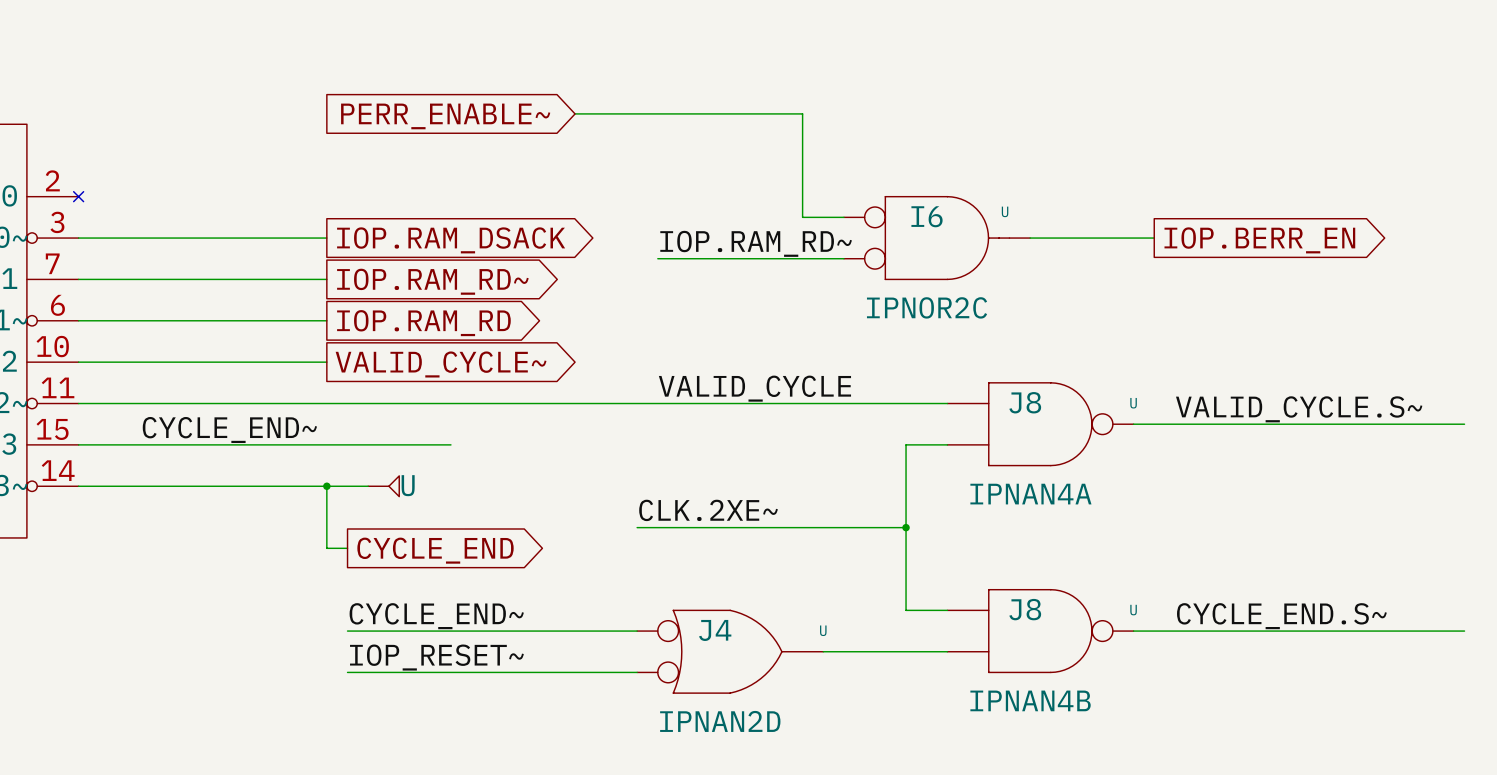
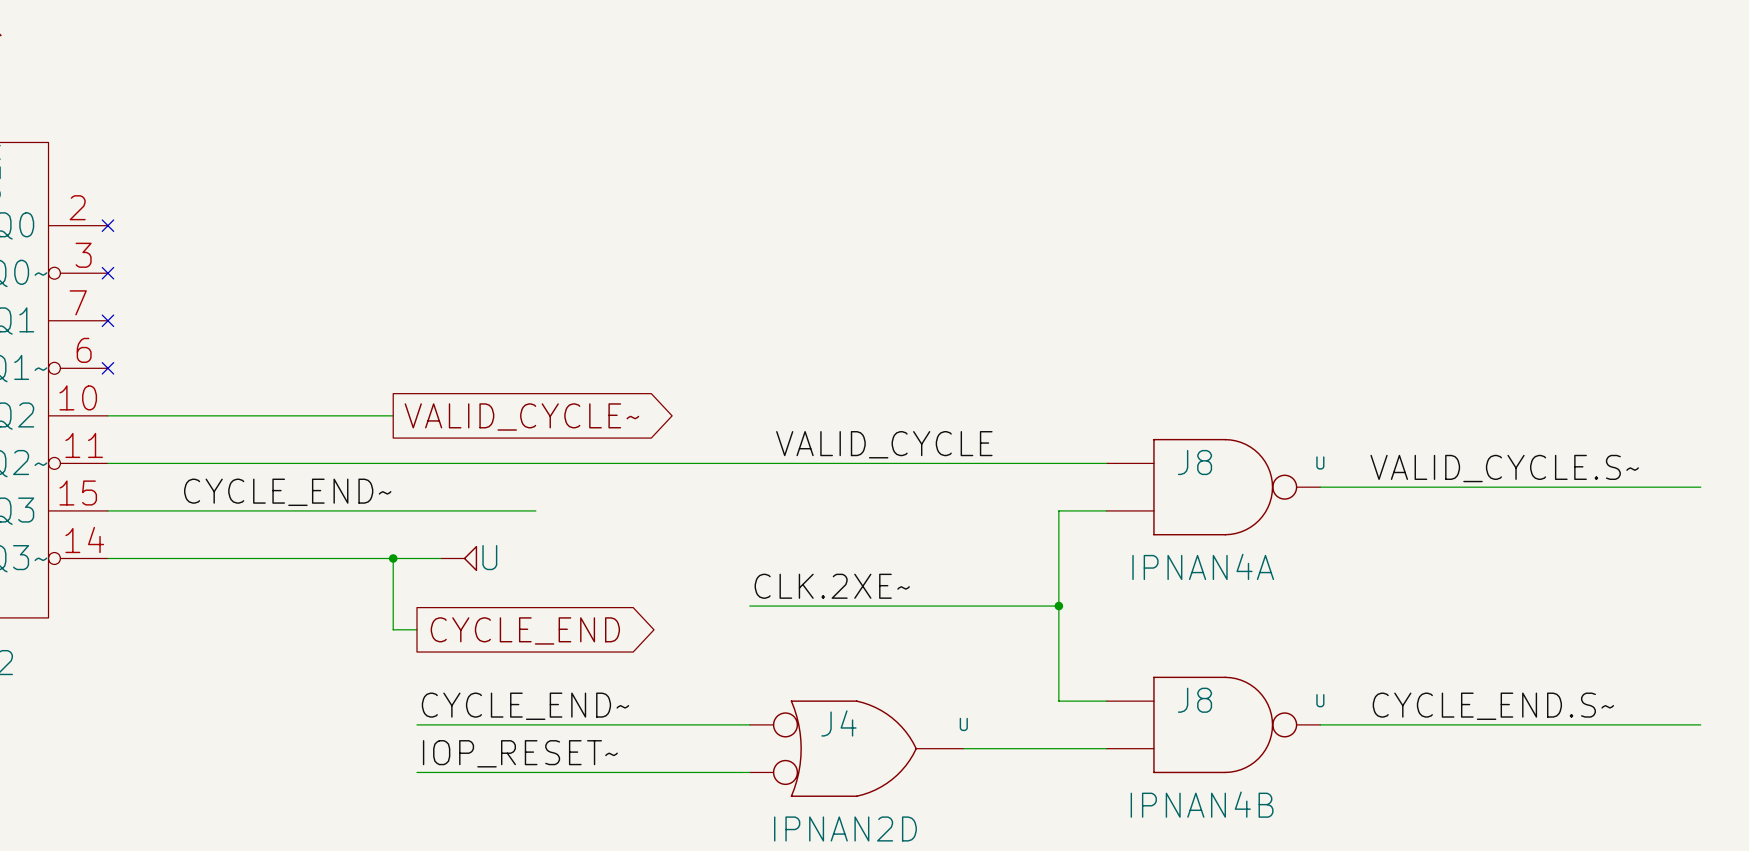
wire: (575, 113) (802, 113) (802, 217) (843, 217) -> none
global label: PERR_ENABLE~ (445, 116) -> none
wire: (78, 238) (326, 238) -> none
no-connect mark: none -> (107, 273)
U: (937, 238) -> none
wire: (1030, 238) (1154, 238) -> none
global label: IOP.RAM_DSACK (451, 240) -> none
global label: IOP.BERR_EN (1259, 240) -> none
label: IOP.RAM_RD~ (756, 243) -> none
wire: (657, 258) (843, 258) -> none
wire: (78, 279) (326, 279) -> none
no-connect mark: none -> (107, 320)
global label: IOP.RAM_RD~ (432, 281) -> none
wire: (78, 320) (326, 320) -> none
no-connect mark: none -> (107, 368)
global label: IOP.RAM_RD (423, 323) -> none

